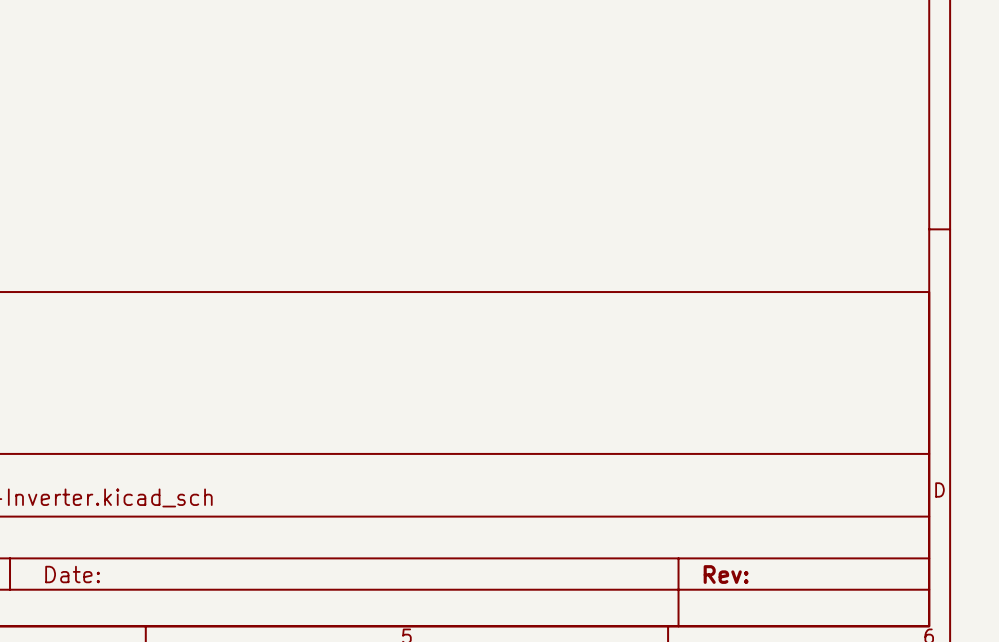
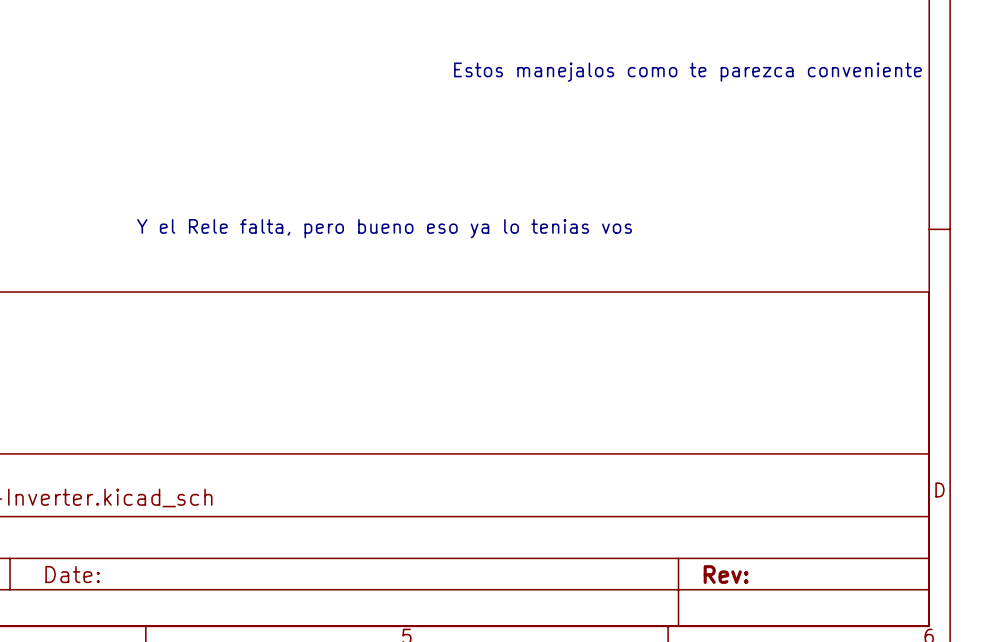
text: none -> Estos manejalos como te parezca conveniente (687, 72)
text: none -> Y el Rele falta, pero bueno eso ya lo tenias vos (384, 228)

